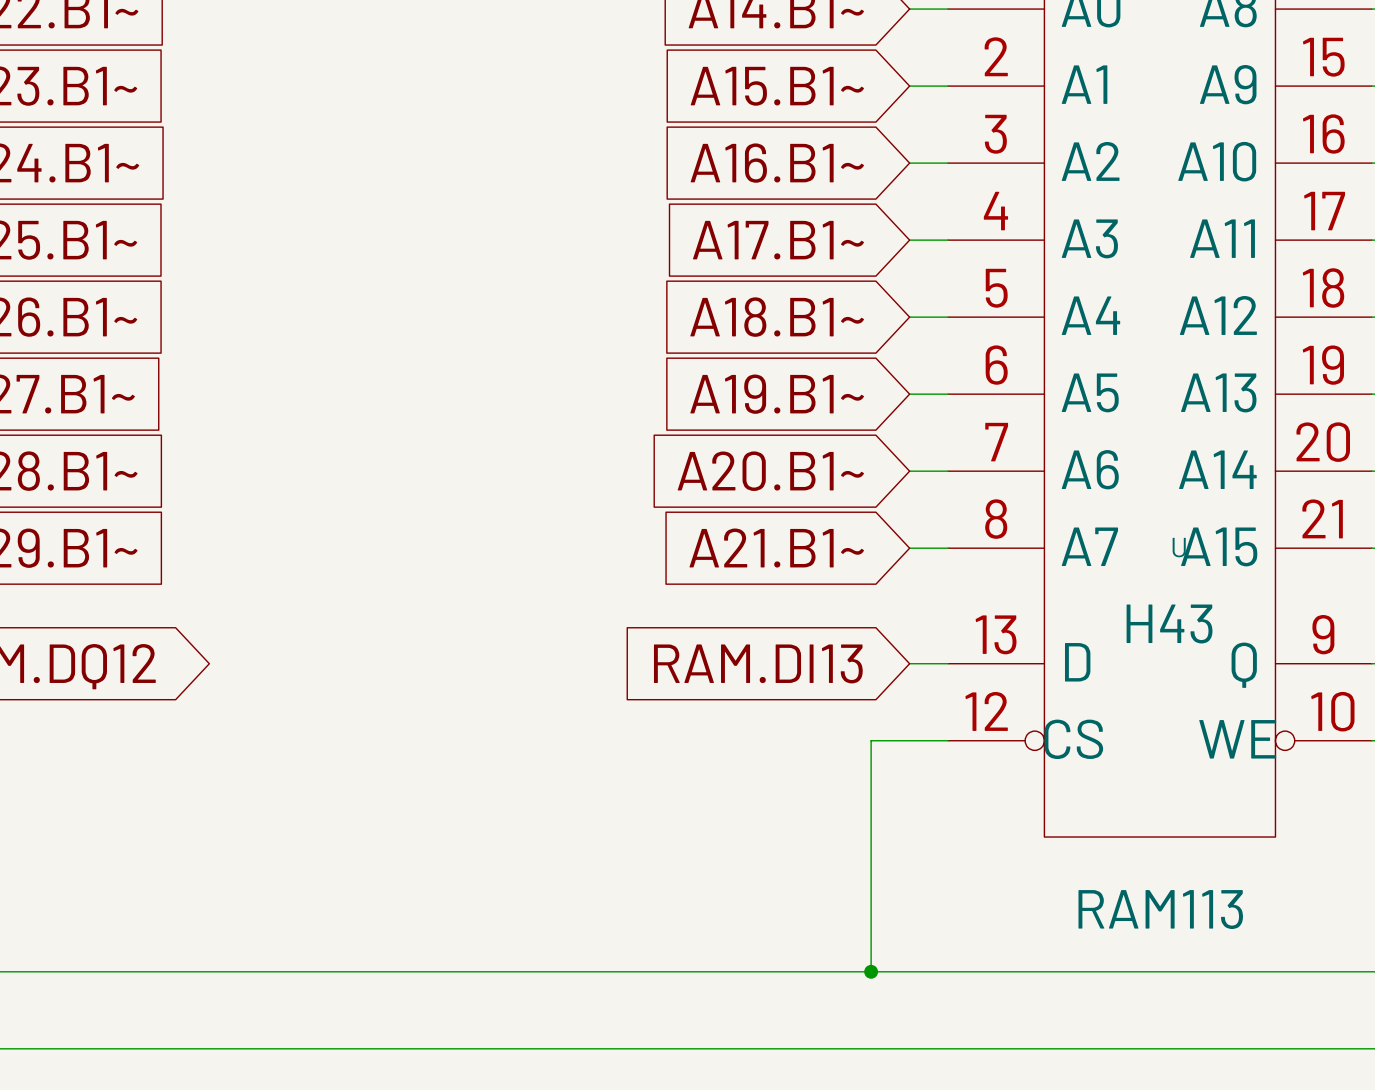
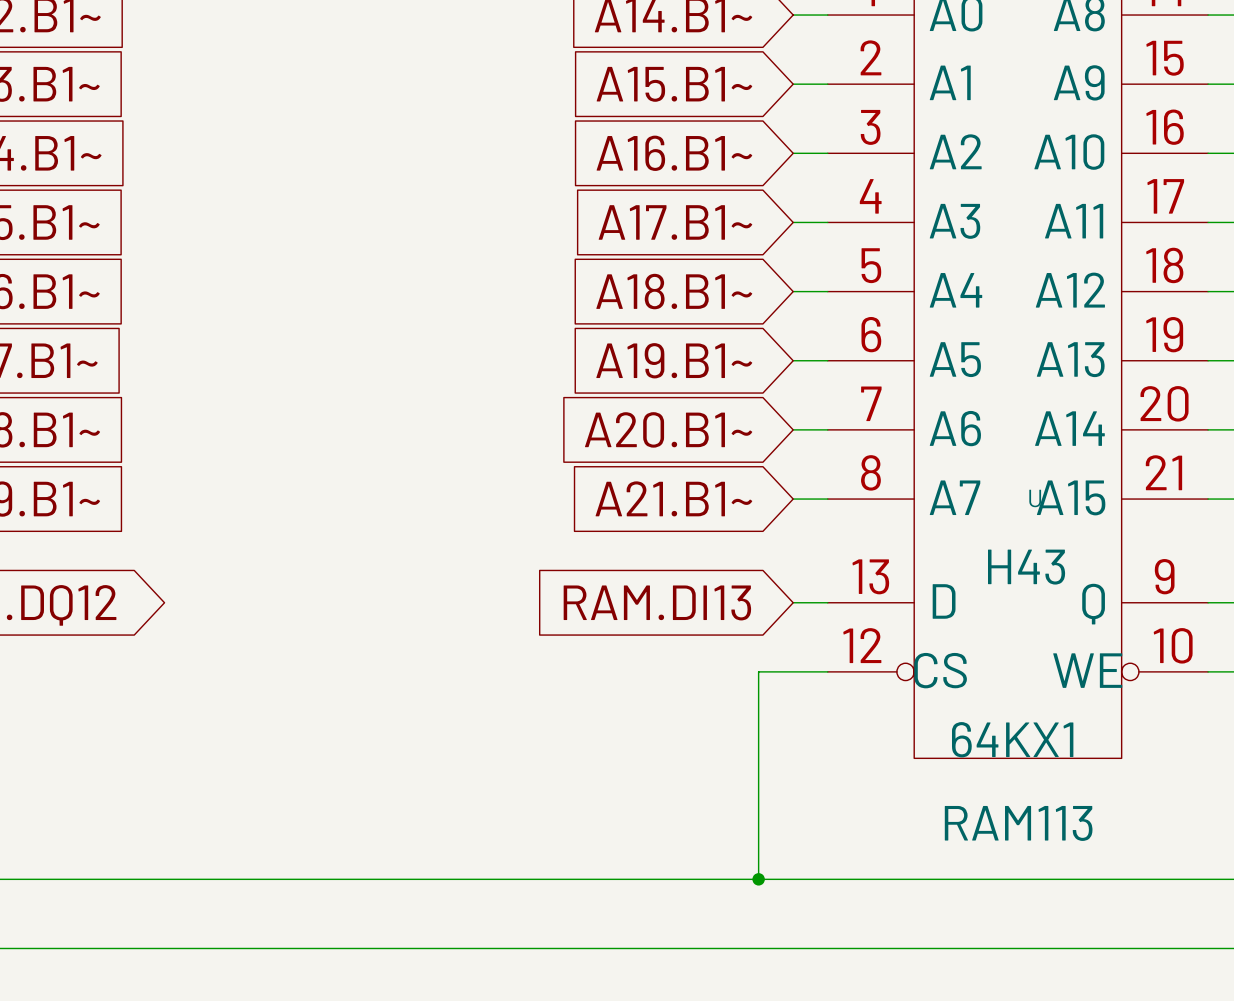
U value: none -> 64KX1 (1012, 739)

